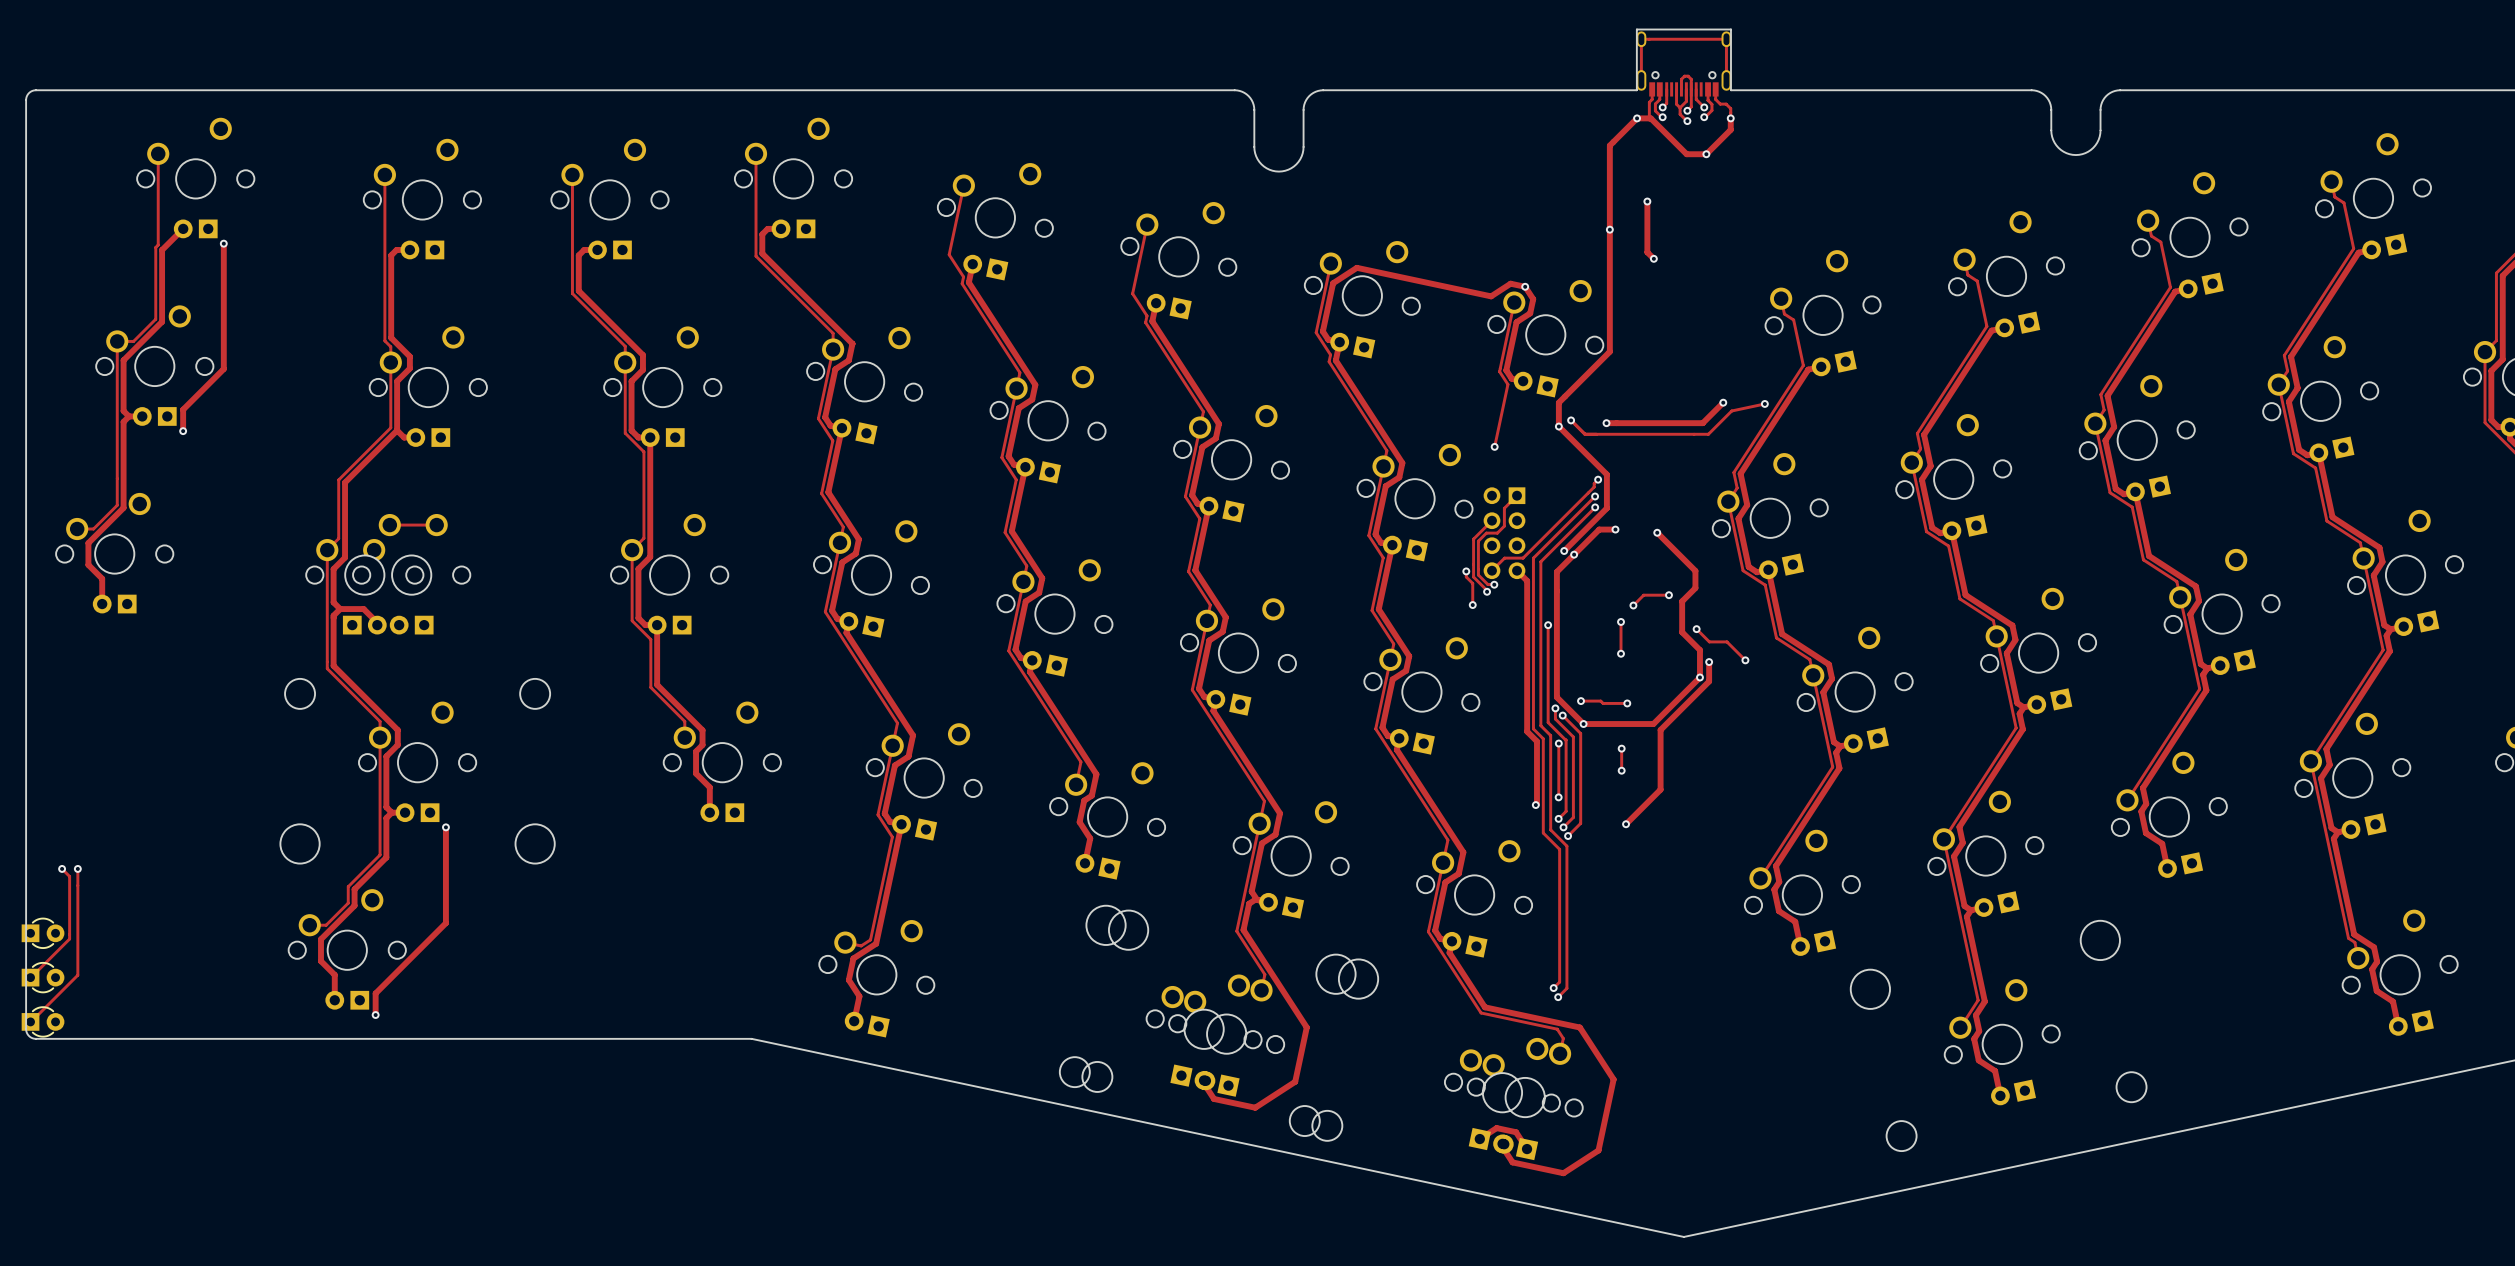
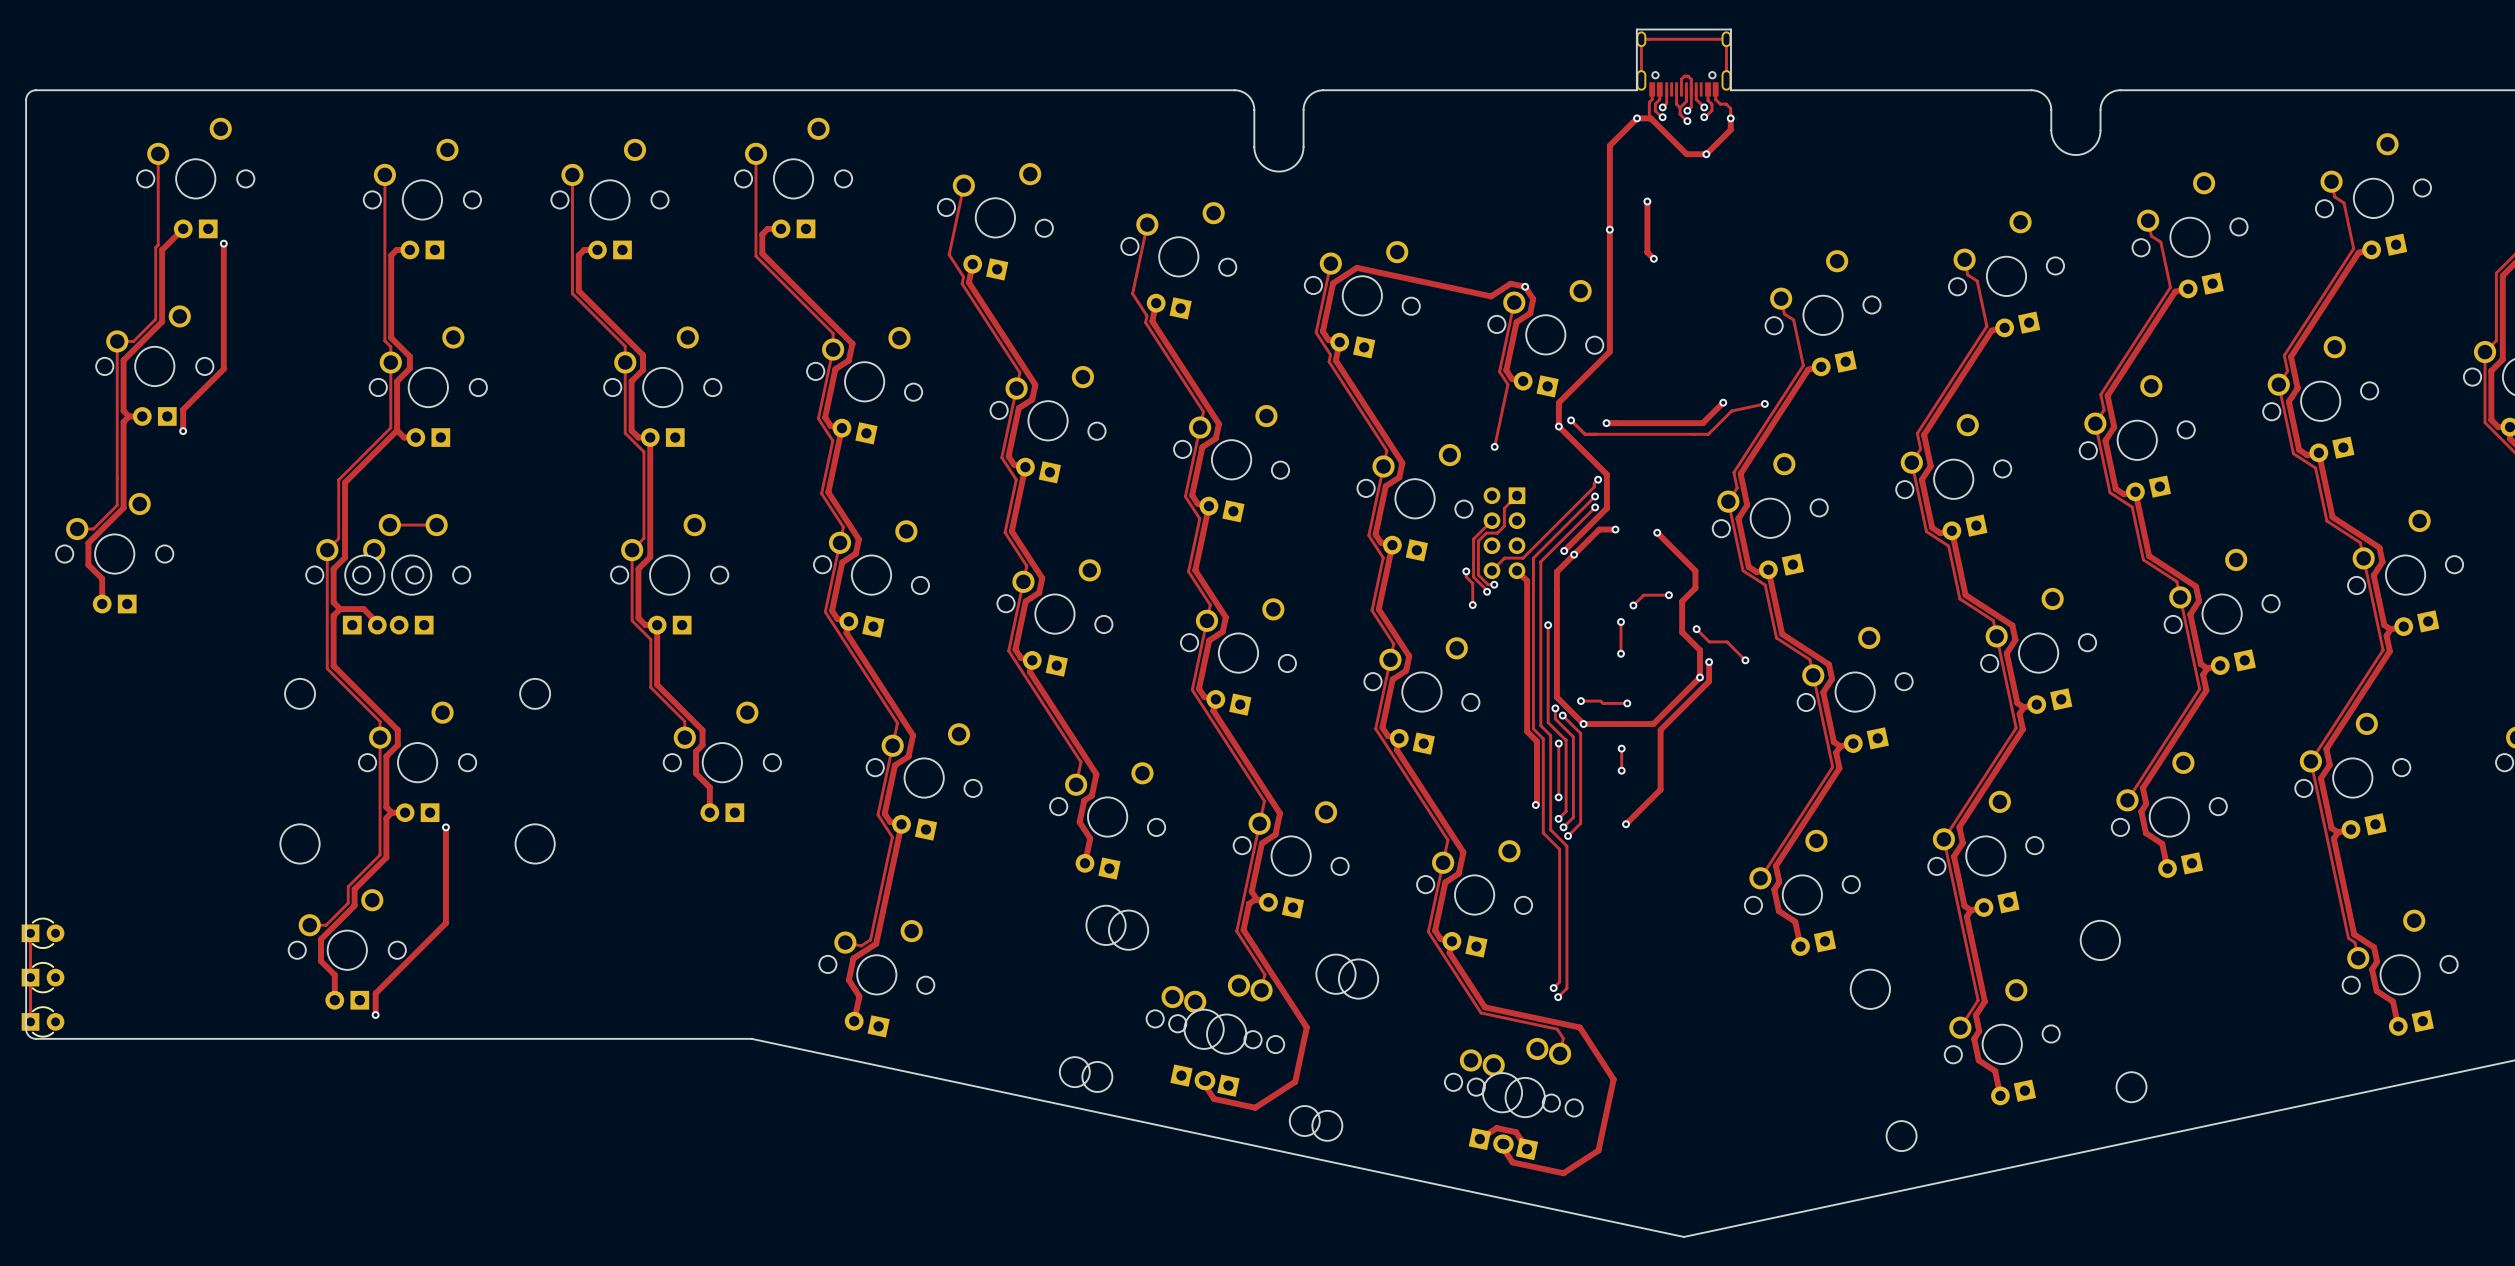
track: (62, 868) (69, 876) (69, 939) (30, 977) -> none
via: (62, 868) -> none
track: (77, 868) (77, 975) (30, 1021) -> (30, 933) (30, 1021)
via: (77, 868) -> none

